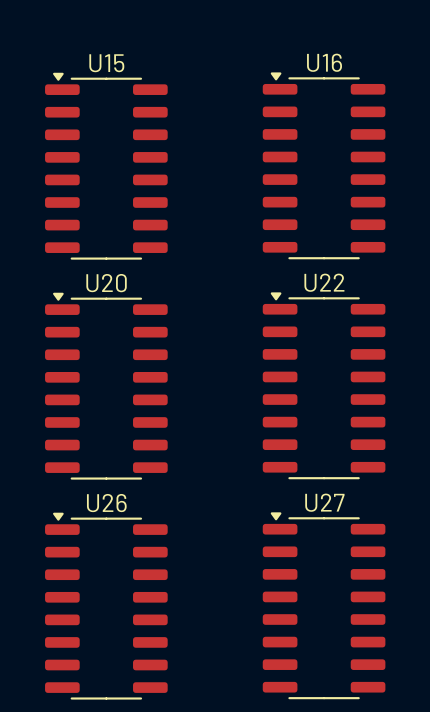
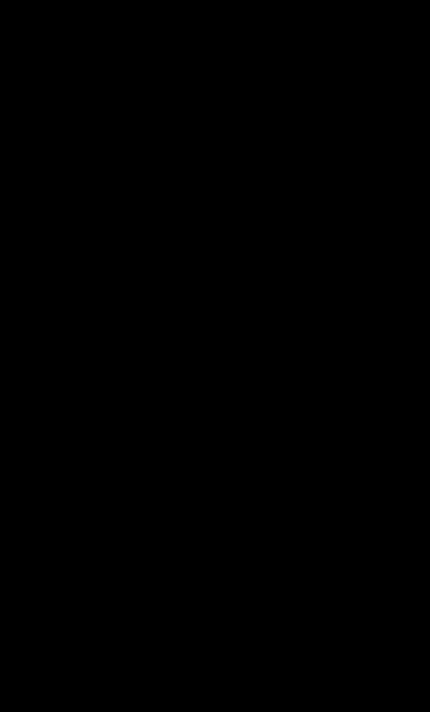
U16: (324, 165) -> none
U15: (106, 166) -> none
U22: (324, 385) -> none
U20: (106, 386) -> none
U27: (324, 605) -> none
U26: (106, 606) -> none

